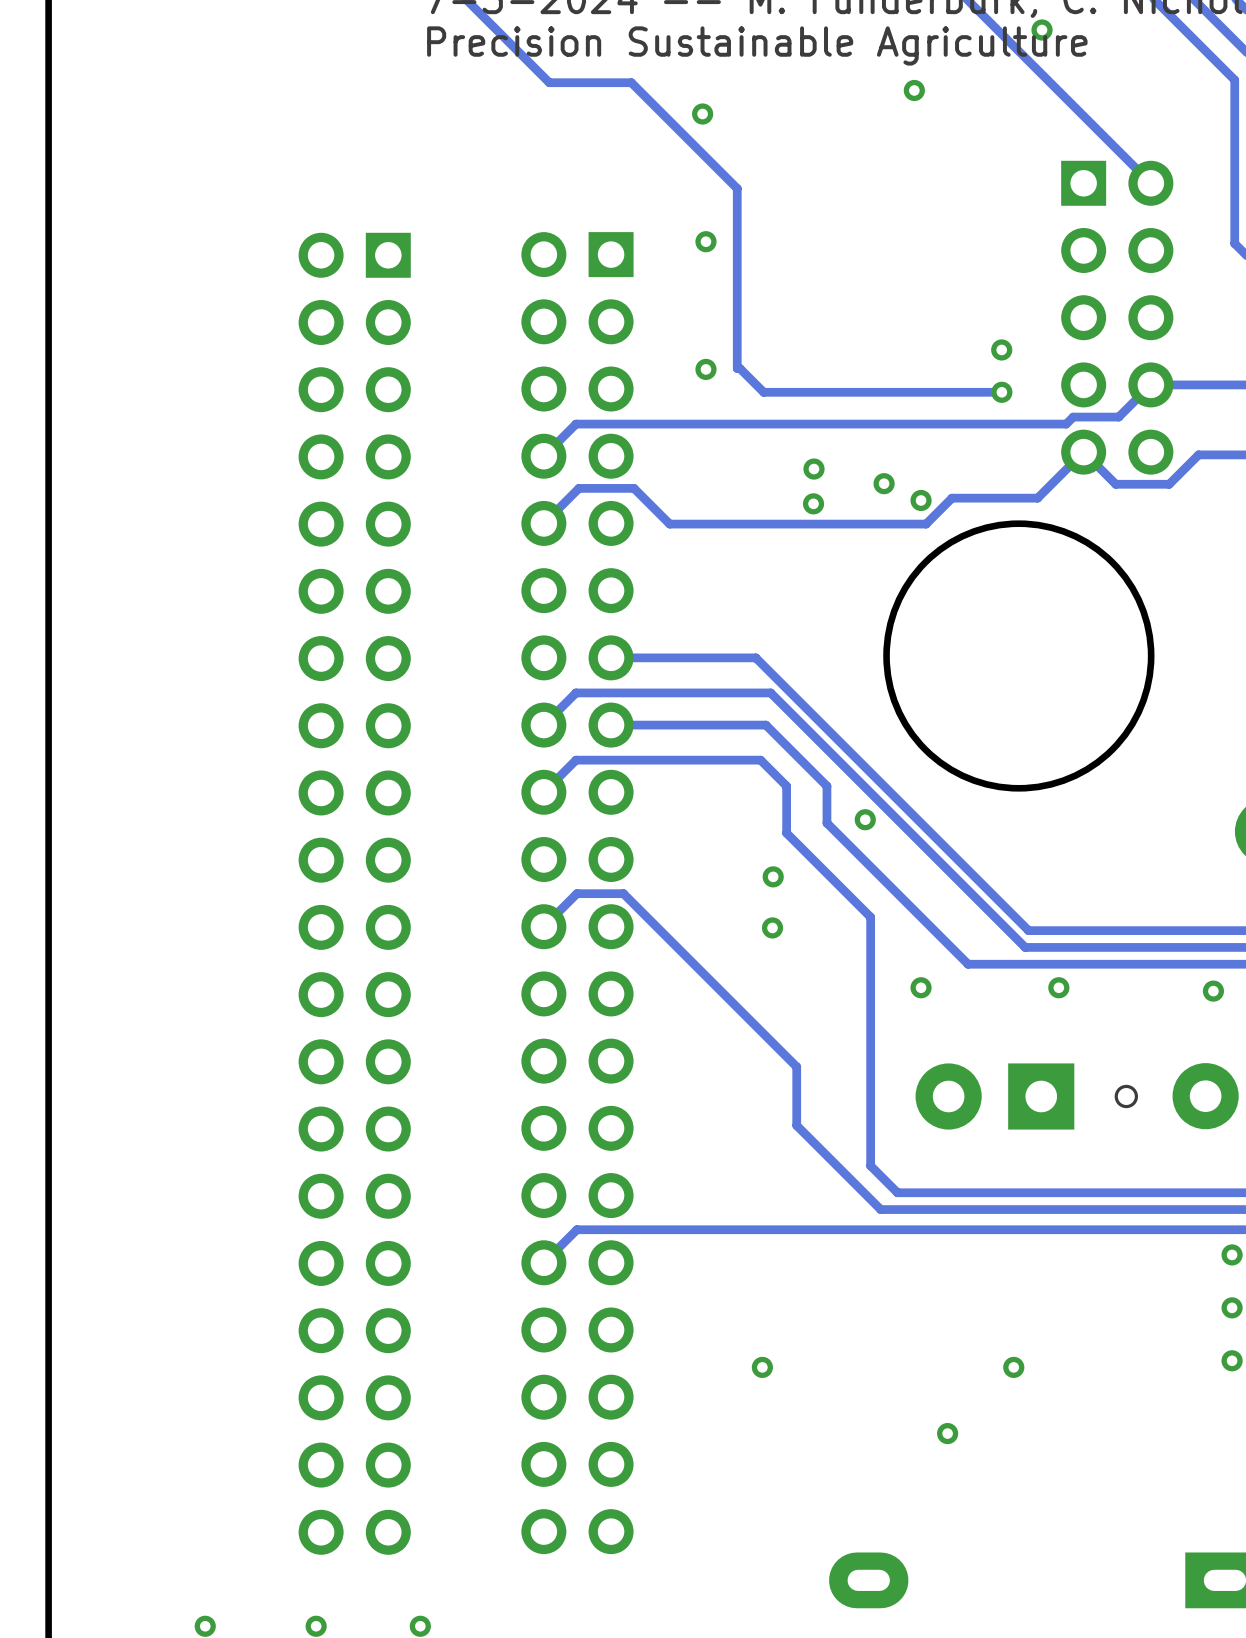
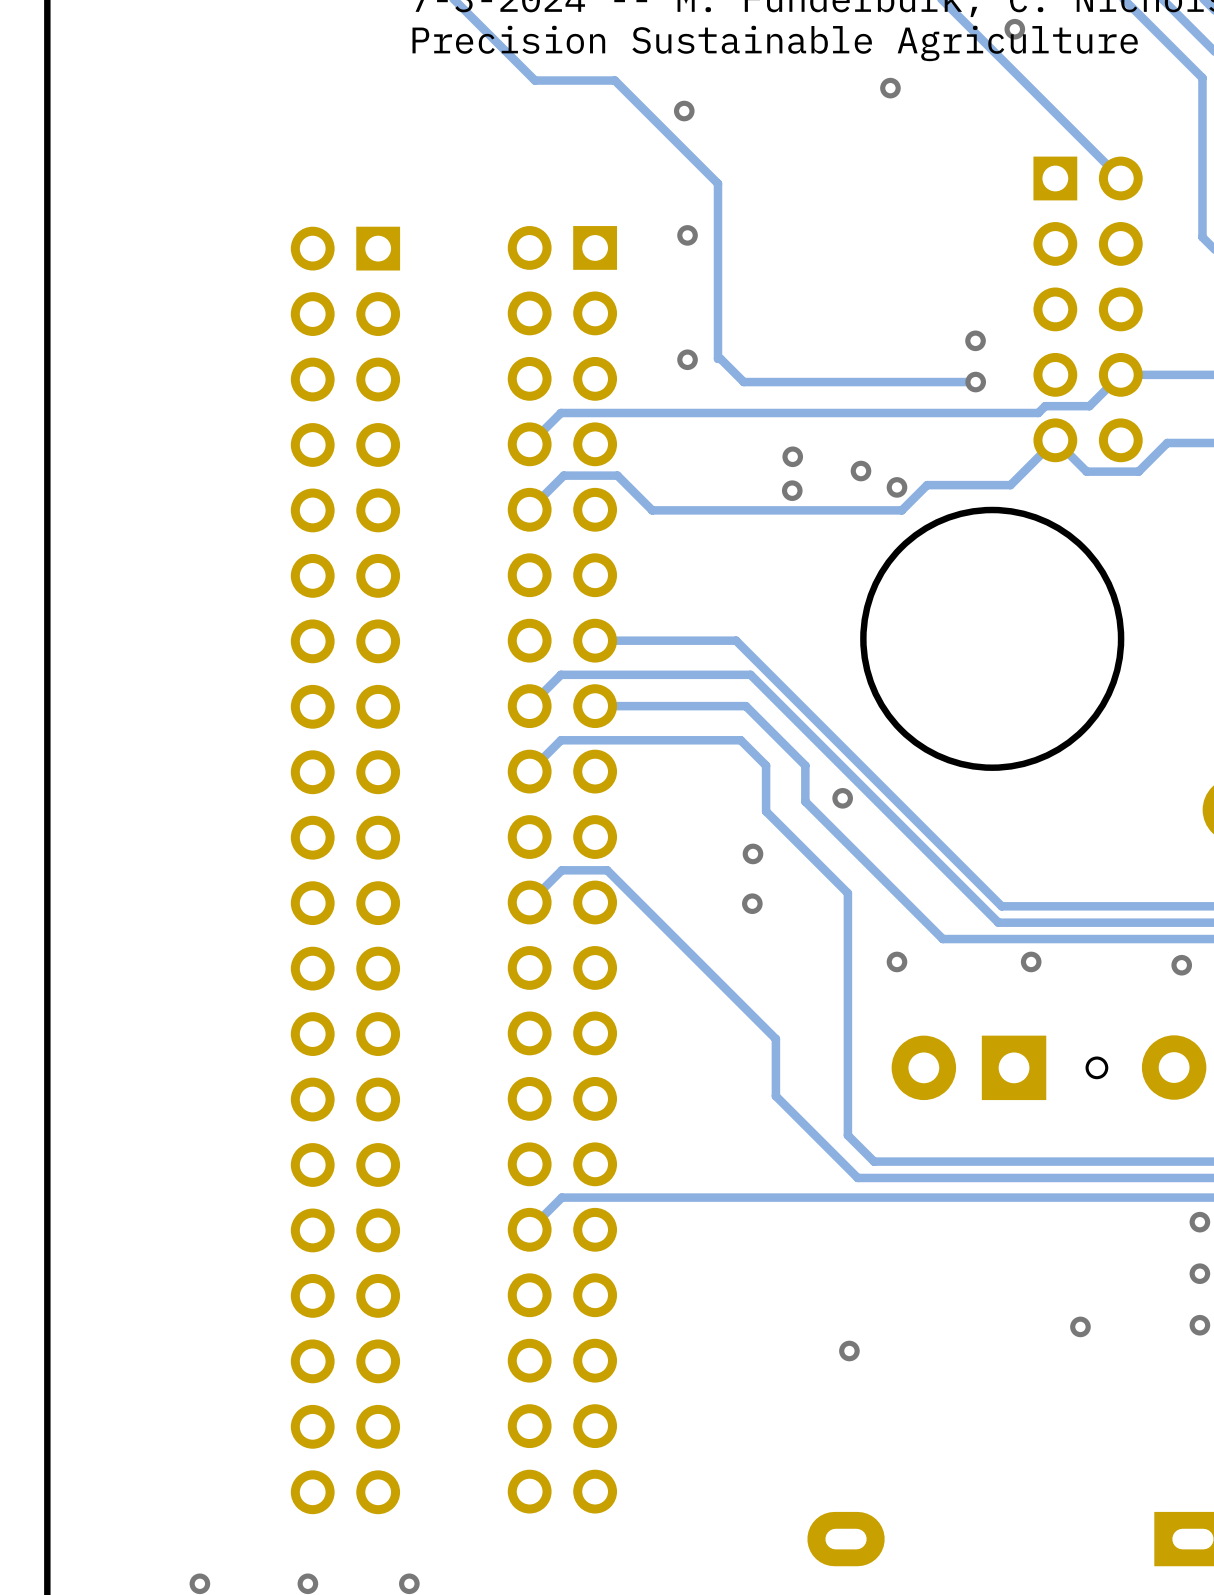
via: none -> (1080, 1326)
via: (762, 1367) -> none
via: (1013, 1367) -> none
via: none -> (849, 1351)
via: (947, 1433) -> none

